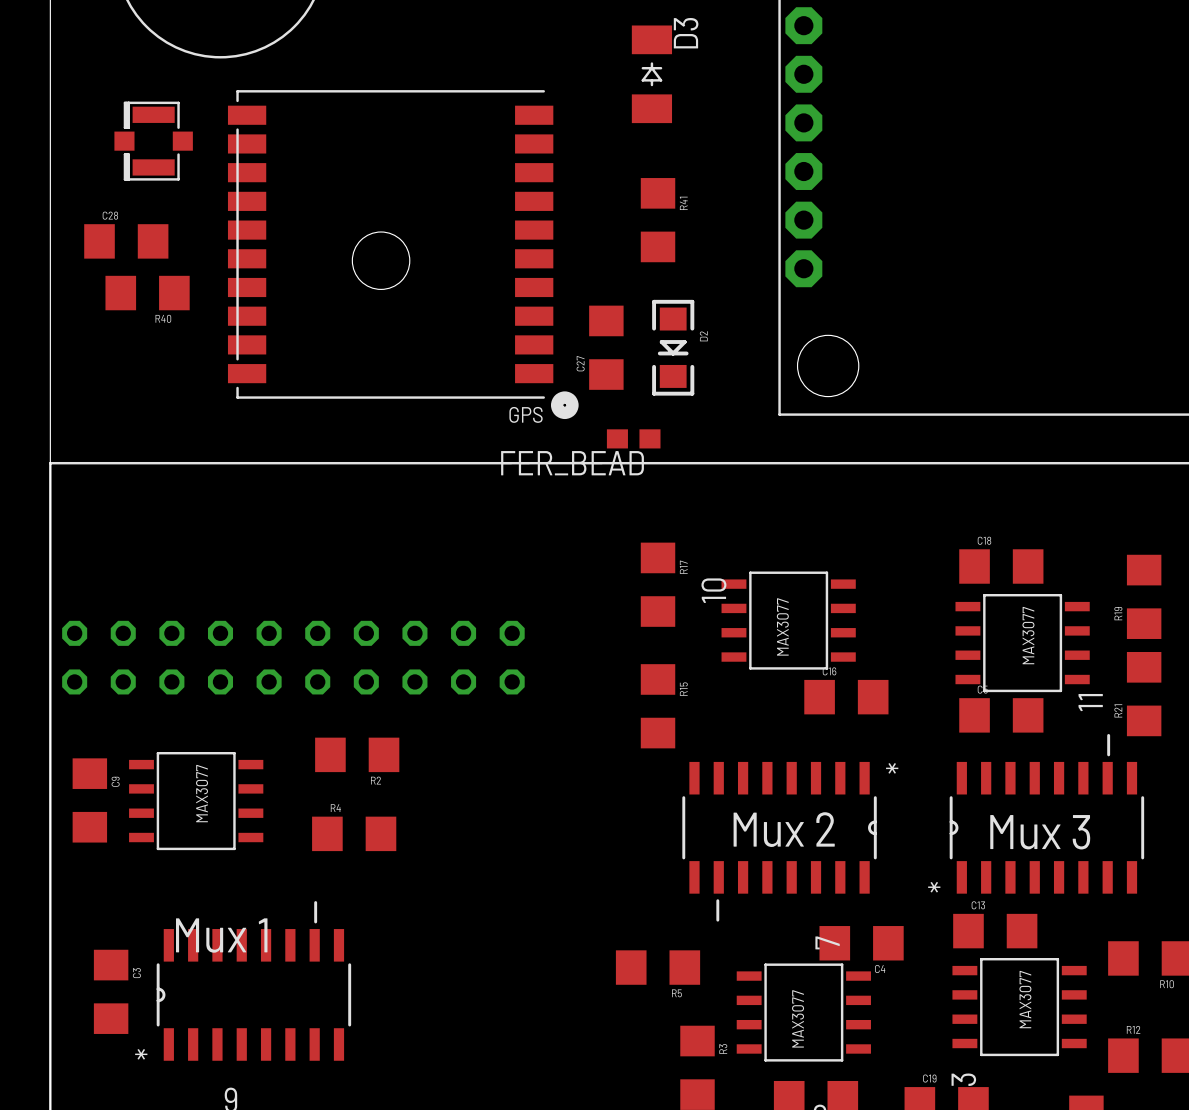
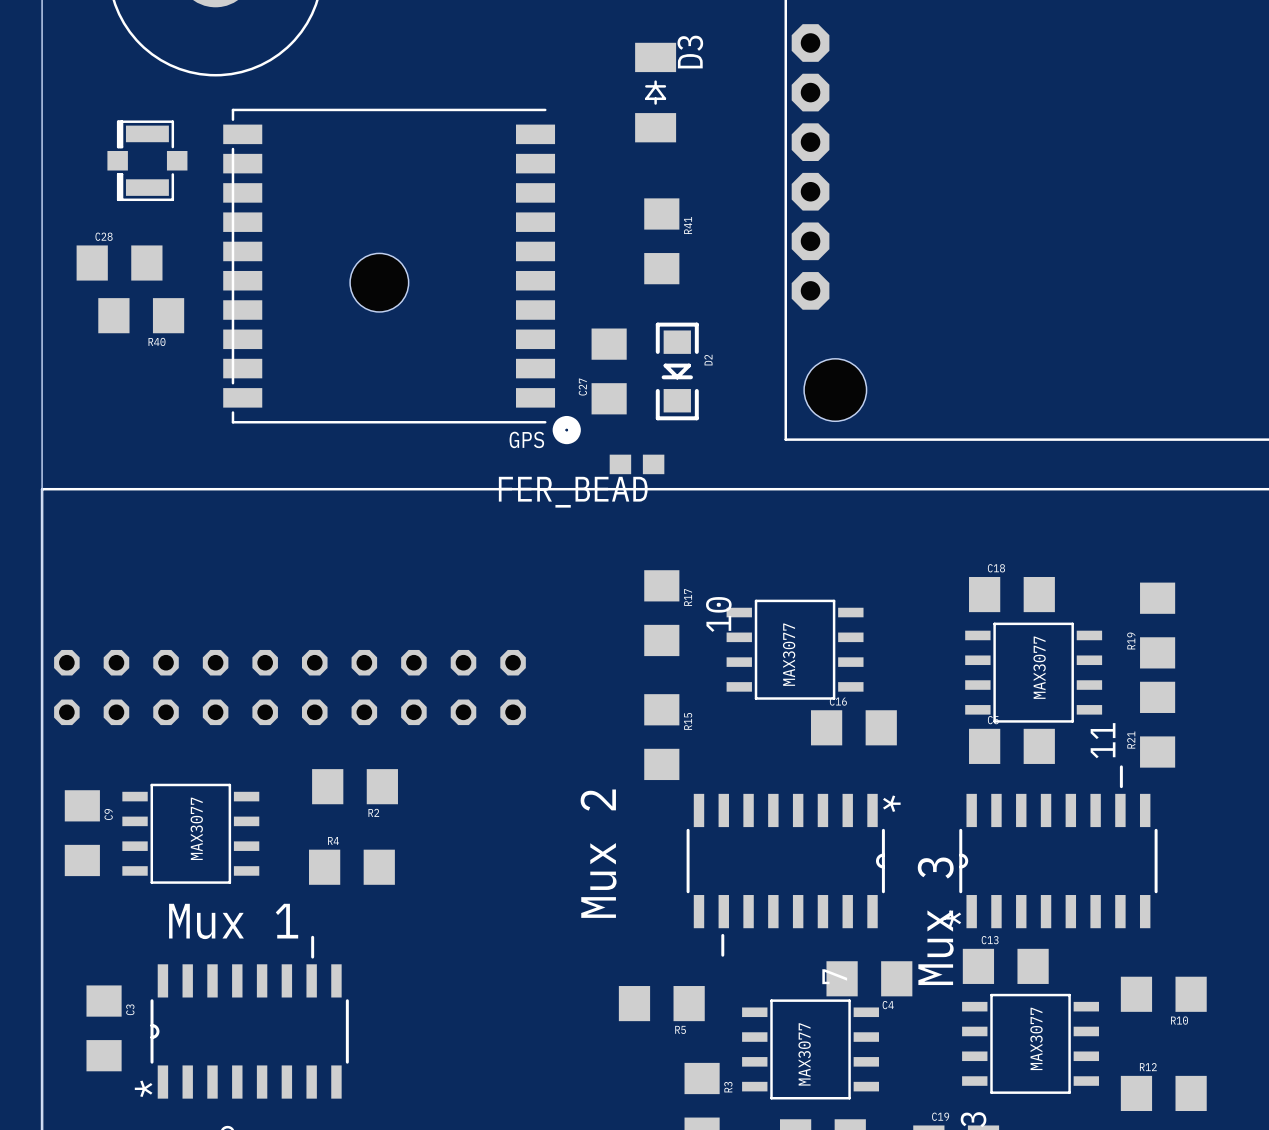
text rotation: 0° (784, 829) -> 90° counterclockwise (598, 853)
text rotation: 0° (1040, 832) -> 90° counterclockwise (935, 921)
text position: Mux 1 (221, 935) -> Mux 1 (233, 921)

